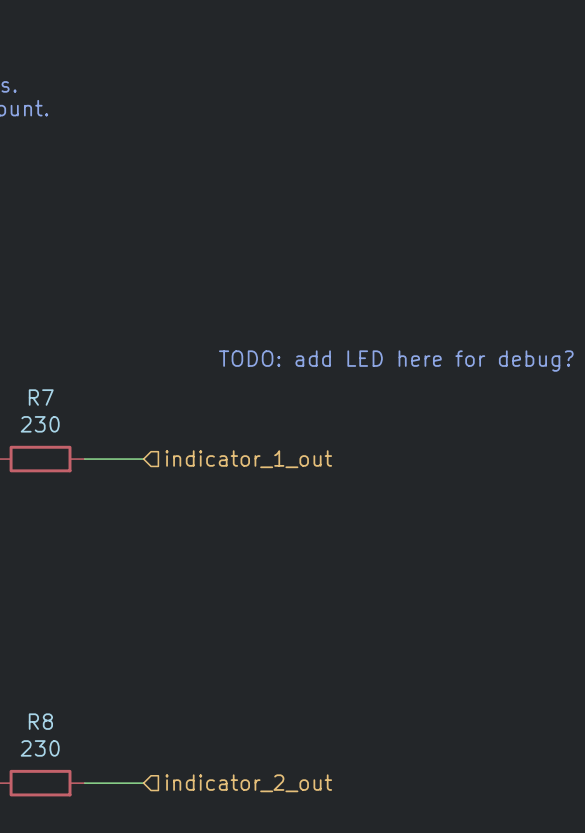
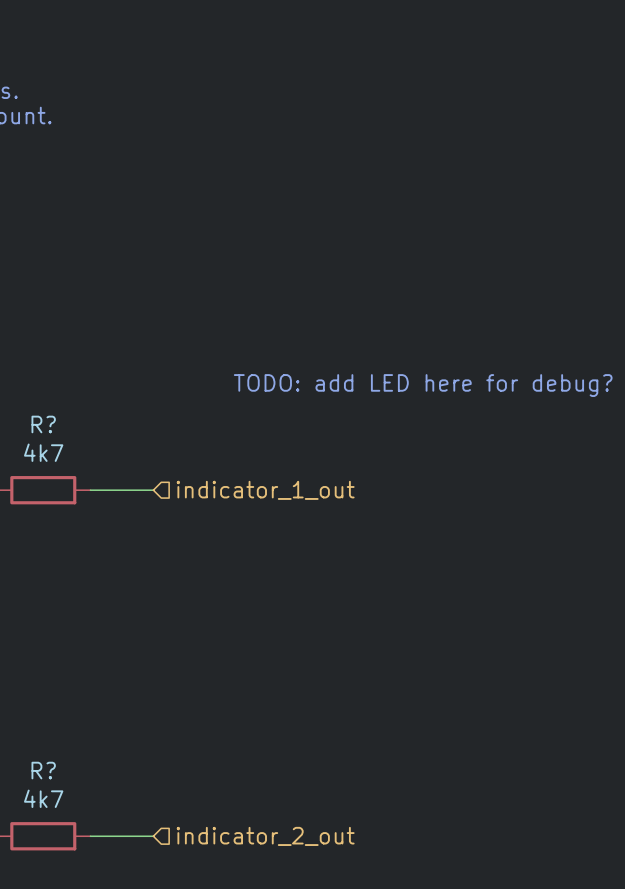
R7 name: R7 (41, 397) -> R? (43, 424)
R7 value: 230 (40, 424) -> 4k7 (43, 452)
R8 name: R8 (40, 721) -> R? (43, 770)
R8 value: 230 (40, 748) -> 4k7 (43, 798)

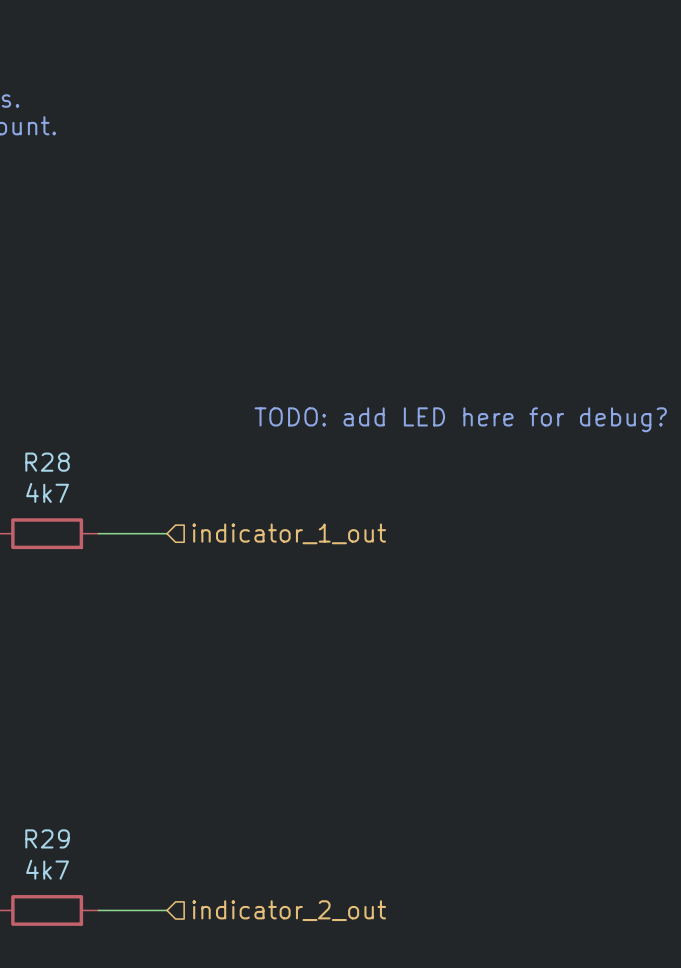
R? name: R? (43, 424) -> R28 (47, 462)
R? name: R? (43, 770) -> R29 (47, 838)

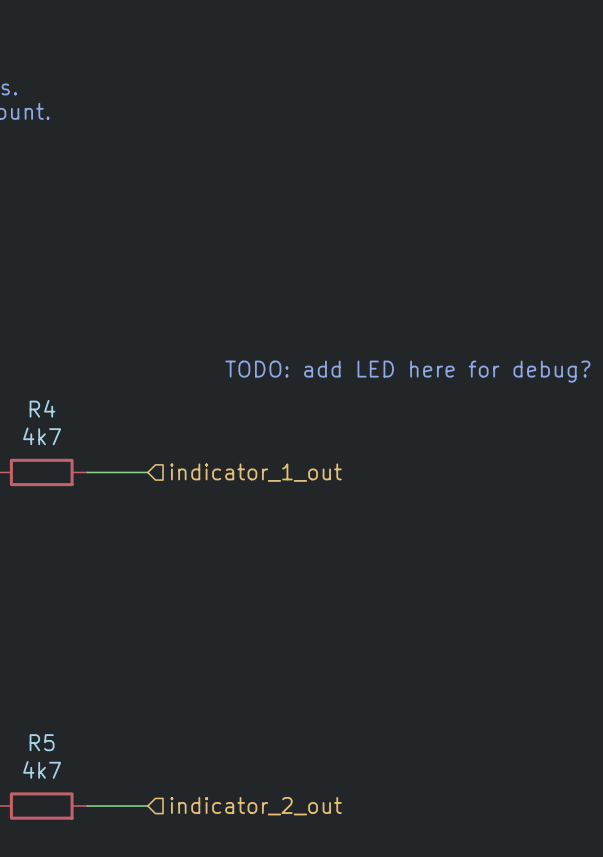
R28 name: R28 (47, 462) -> R4 (42, 408)
R29 name: R29 (47, 838) -> R5 (42, 742)

